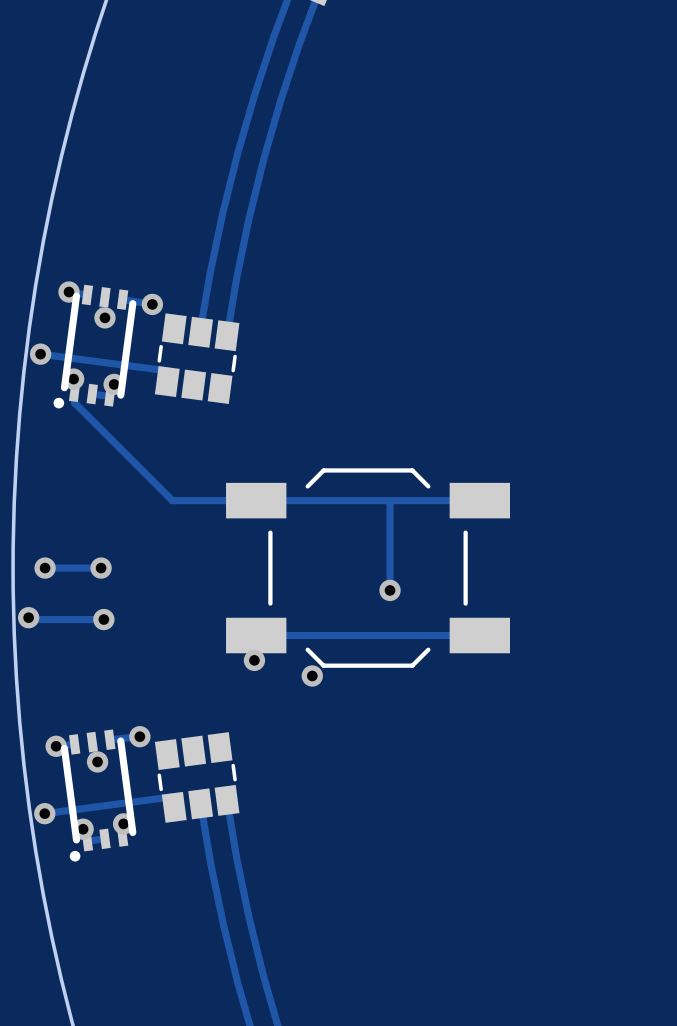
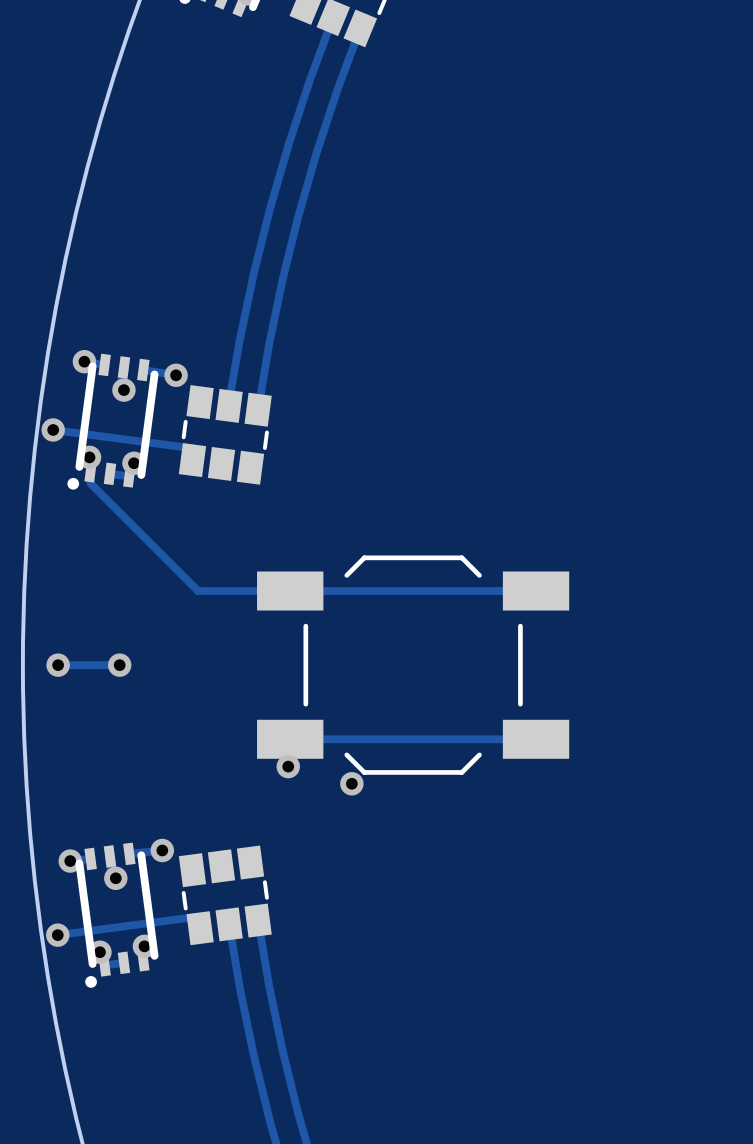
track: (390, 501) (390, 590) -> none
via: (390, 590) -> none
track: (28, 617) (30, 619) (103, 619) -> none
via: (28, 617) -> none
via: (103, 619) -> none

